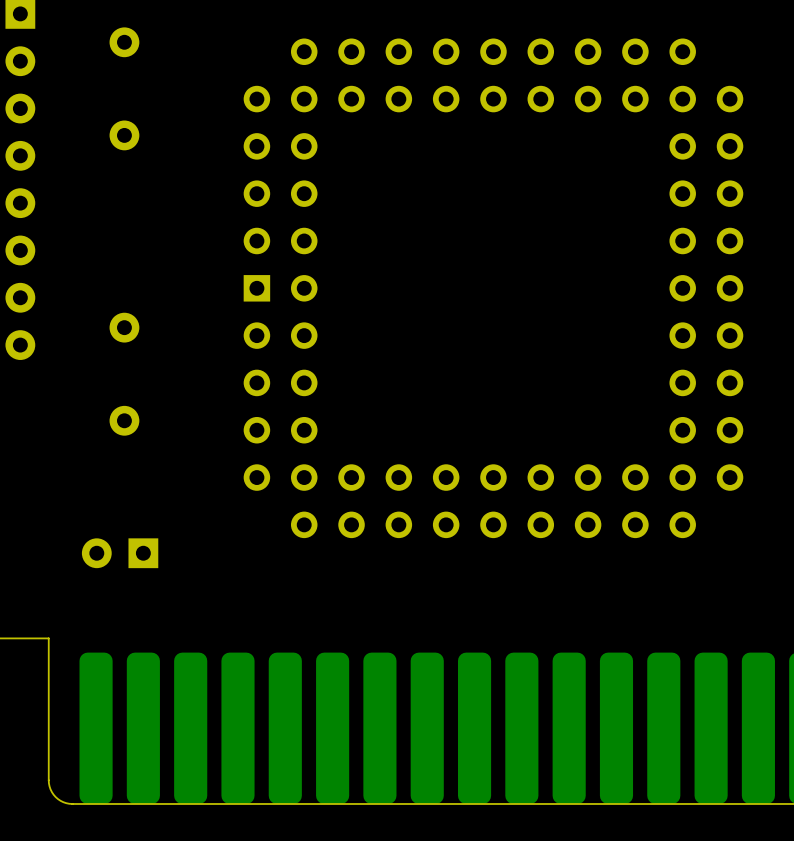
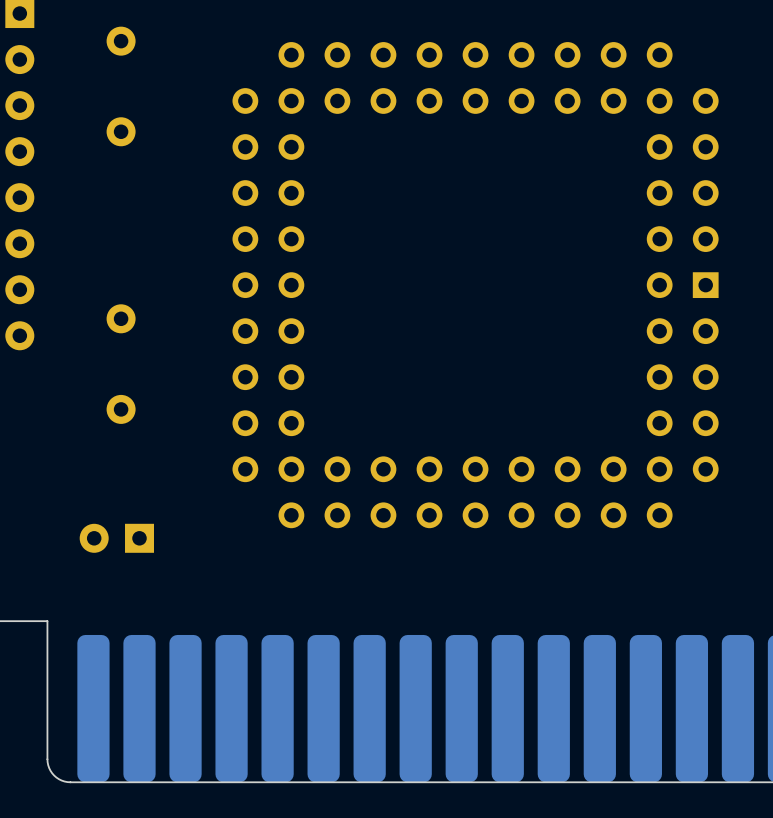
part rotation: 0° (493, 288) -> 180° (475, 285)

